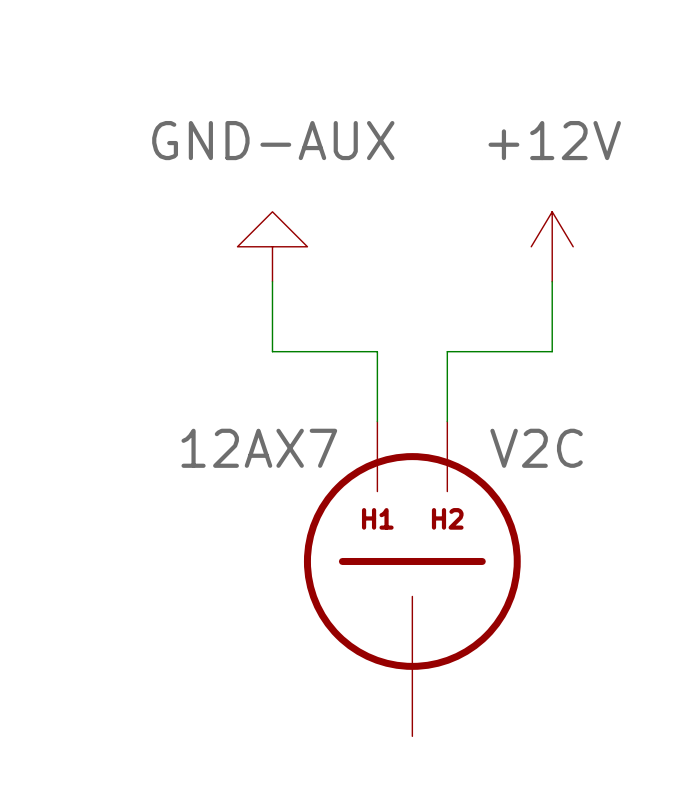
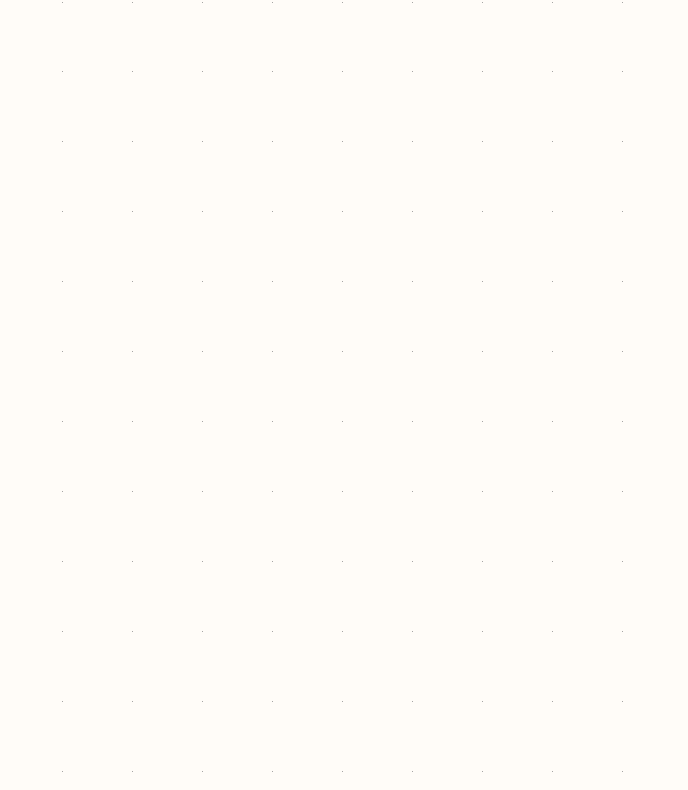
power symbol: GND-AUX (272, 246) -> none
power symbol: +12V (552, 246) -> none
wire: (272, 281) (272, 351) (377, 351) (377, 421) -> none
wire: (552, 281) (552, 351) (447, 351) (447, 421) -> none
V2C: 12AX7 (412, 578) -> none

